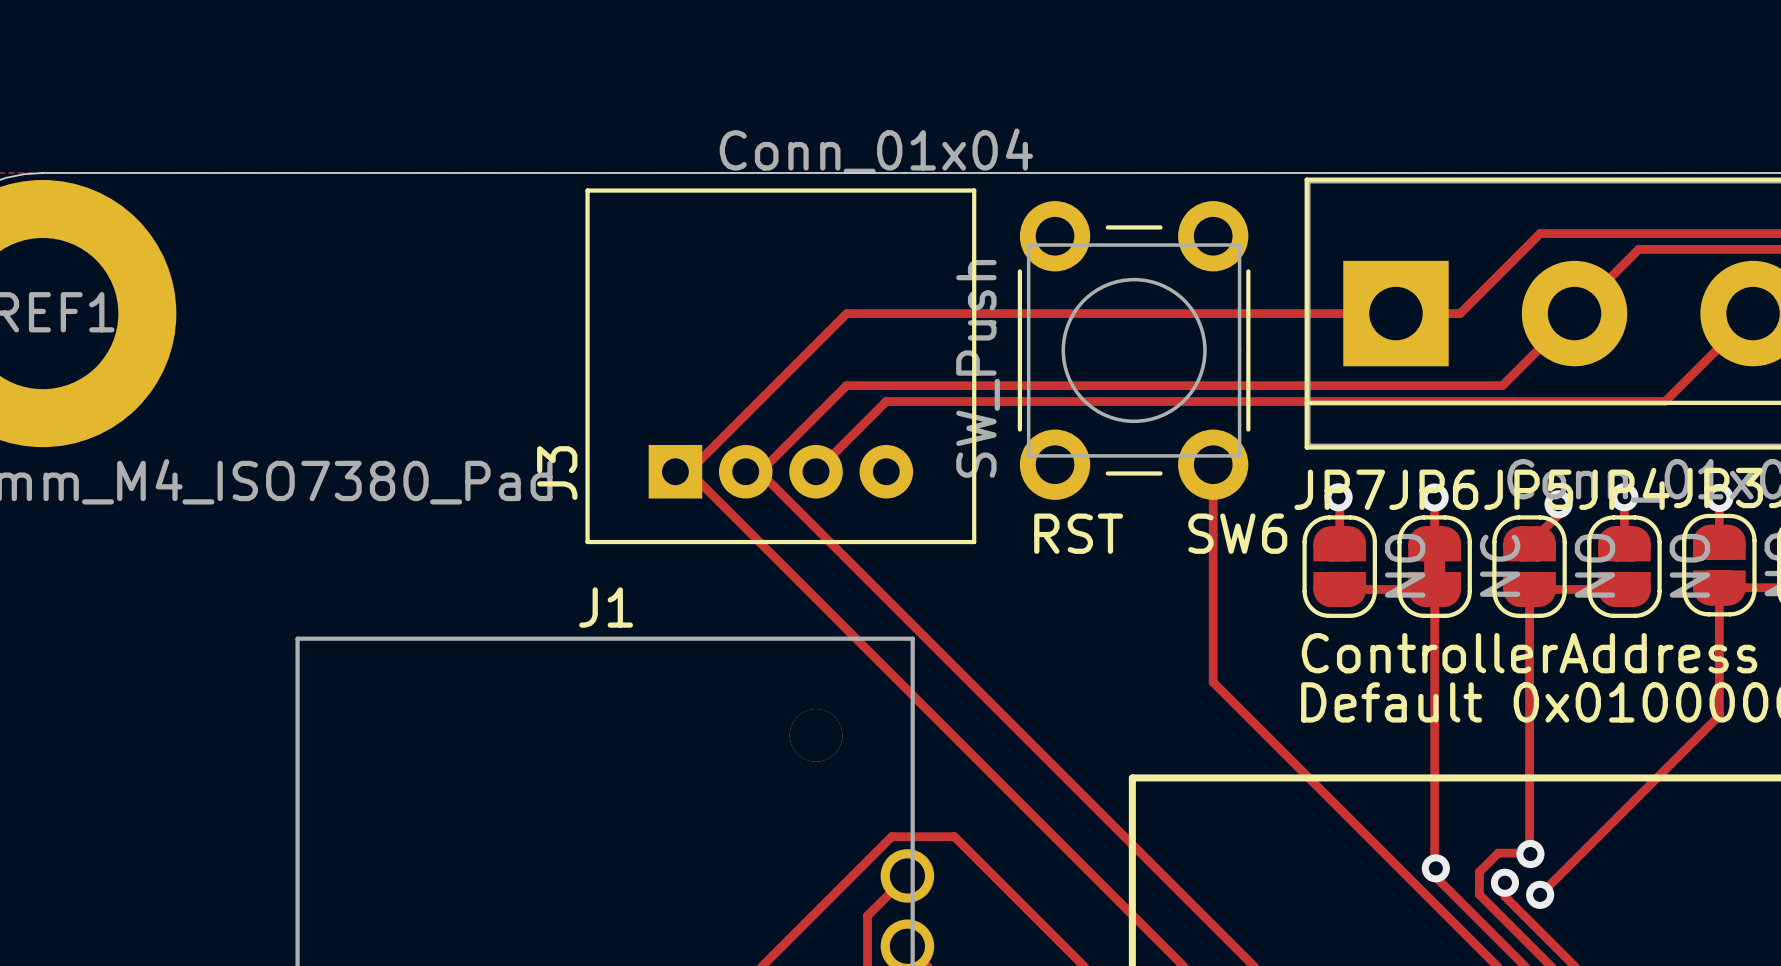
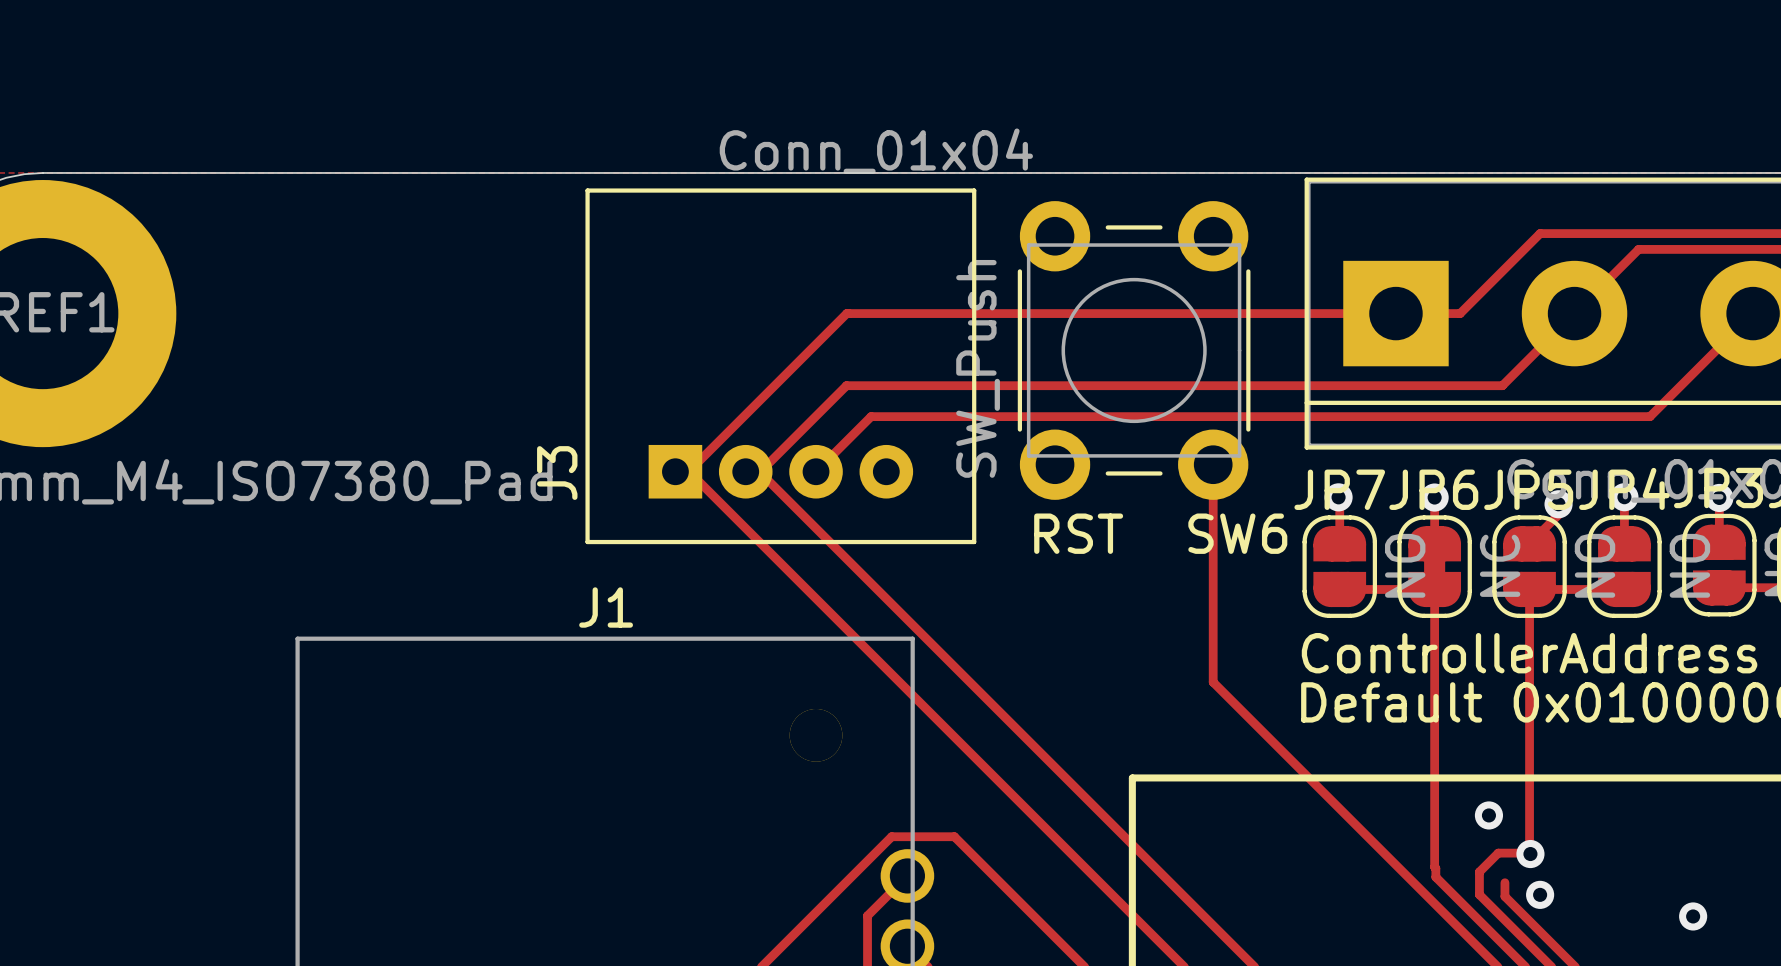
track: (1665, 401) (886, 401) (871, 416) -> (1665, 401) (1650, 416) (871, 416)
track: (1719, 588) (1719, 715) (1540, 894) -> none
via: none -> (1488, 815)
via: (1435, 868) -> none
via: (1504, 882) -> none
via: none -> (1693, 916)

